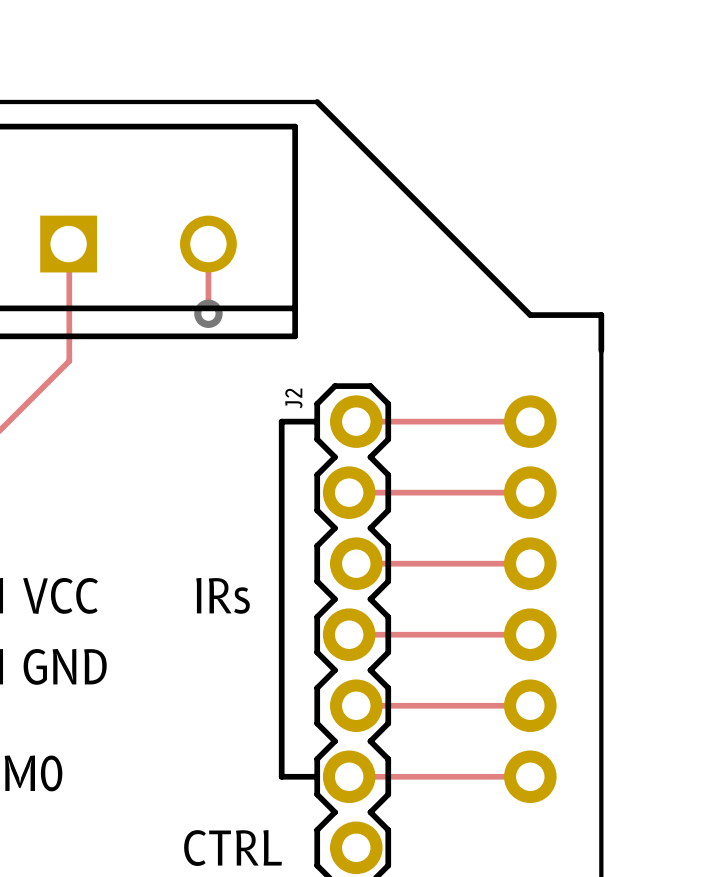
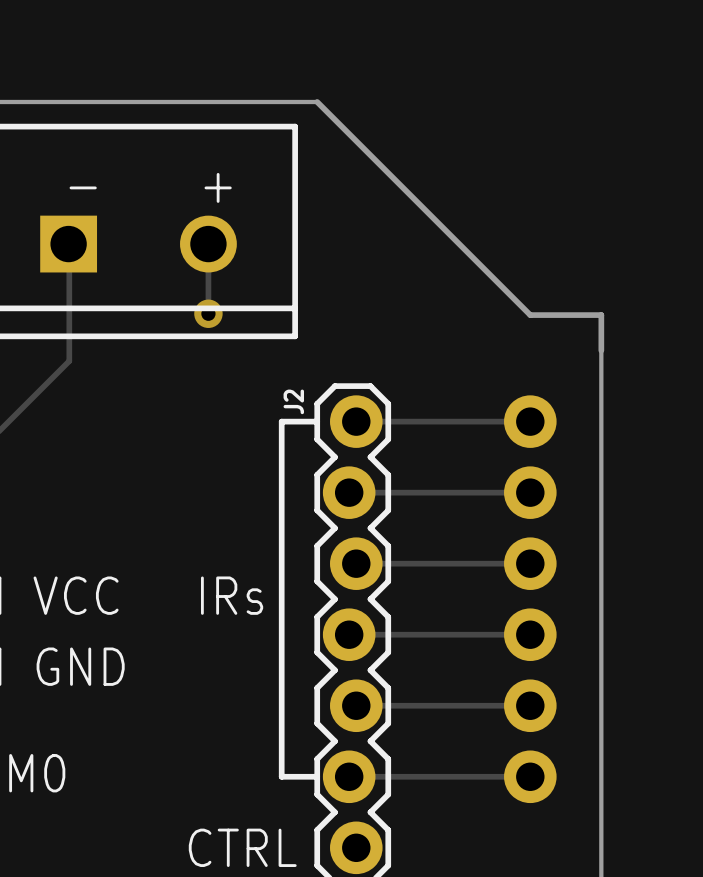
text: none -> + (218, 187)
text: none -> - (83, 187)

